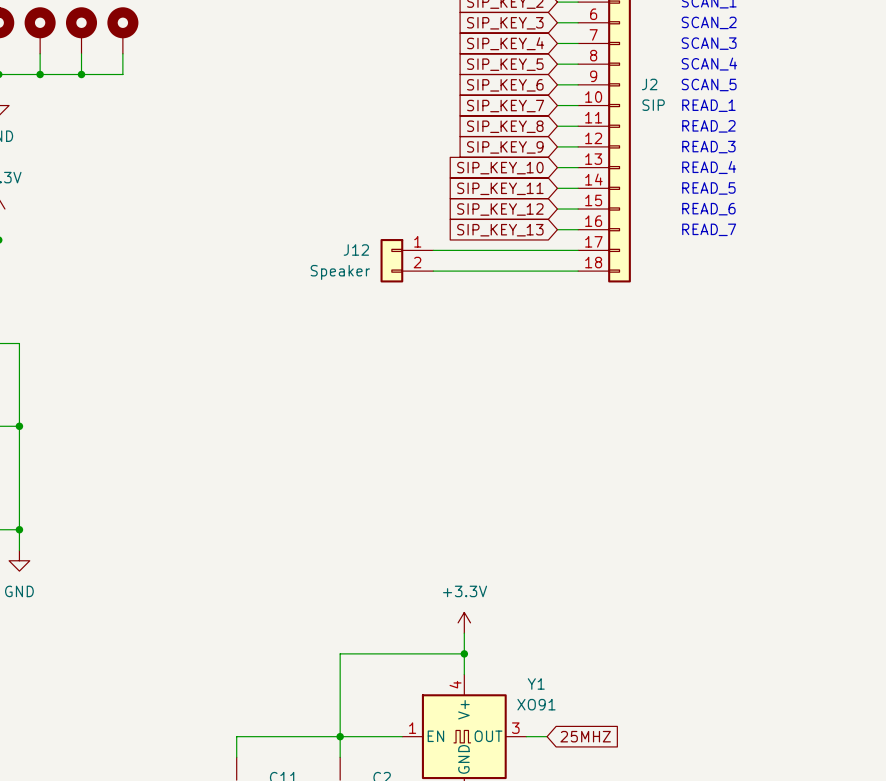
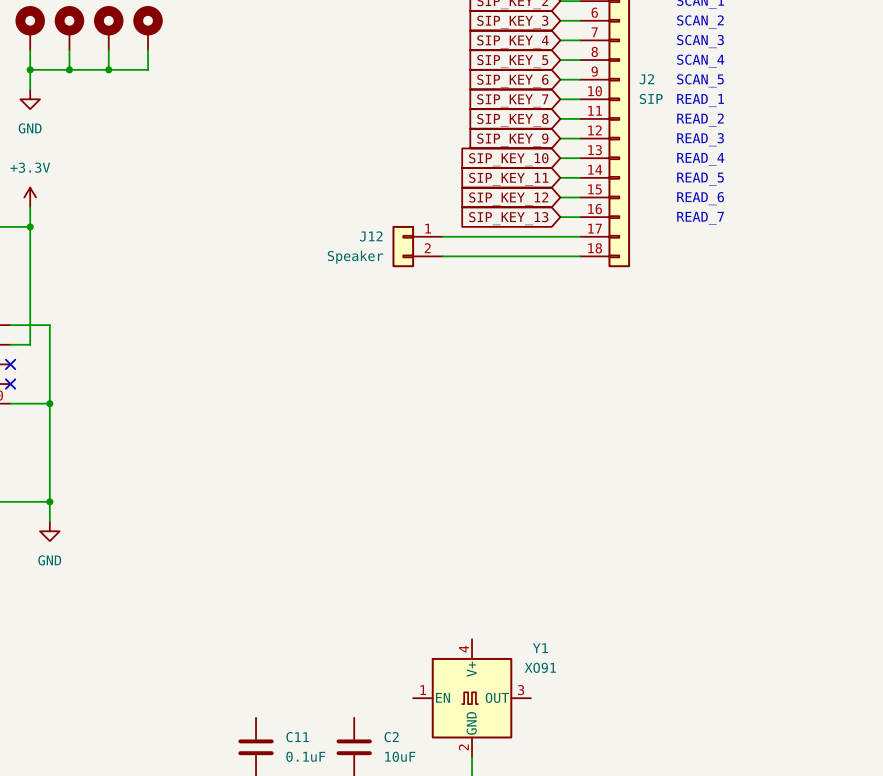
power symbol: +3.3V (464, 622) -> none
wire: (464, 633) (464, 674) -> none
wire: (464, 653) (340, 653) (340, 757) -> none
junction: (464, 653) -> none
junction: (340, 736) -> none
wire: (402, 736) (236, 736) (236, 757) -> none
wire: (526, 736) (547, 736) -> none
global label: 25MHZ (585, 736) -> none

